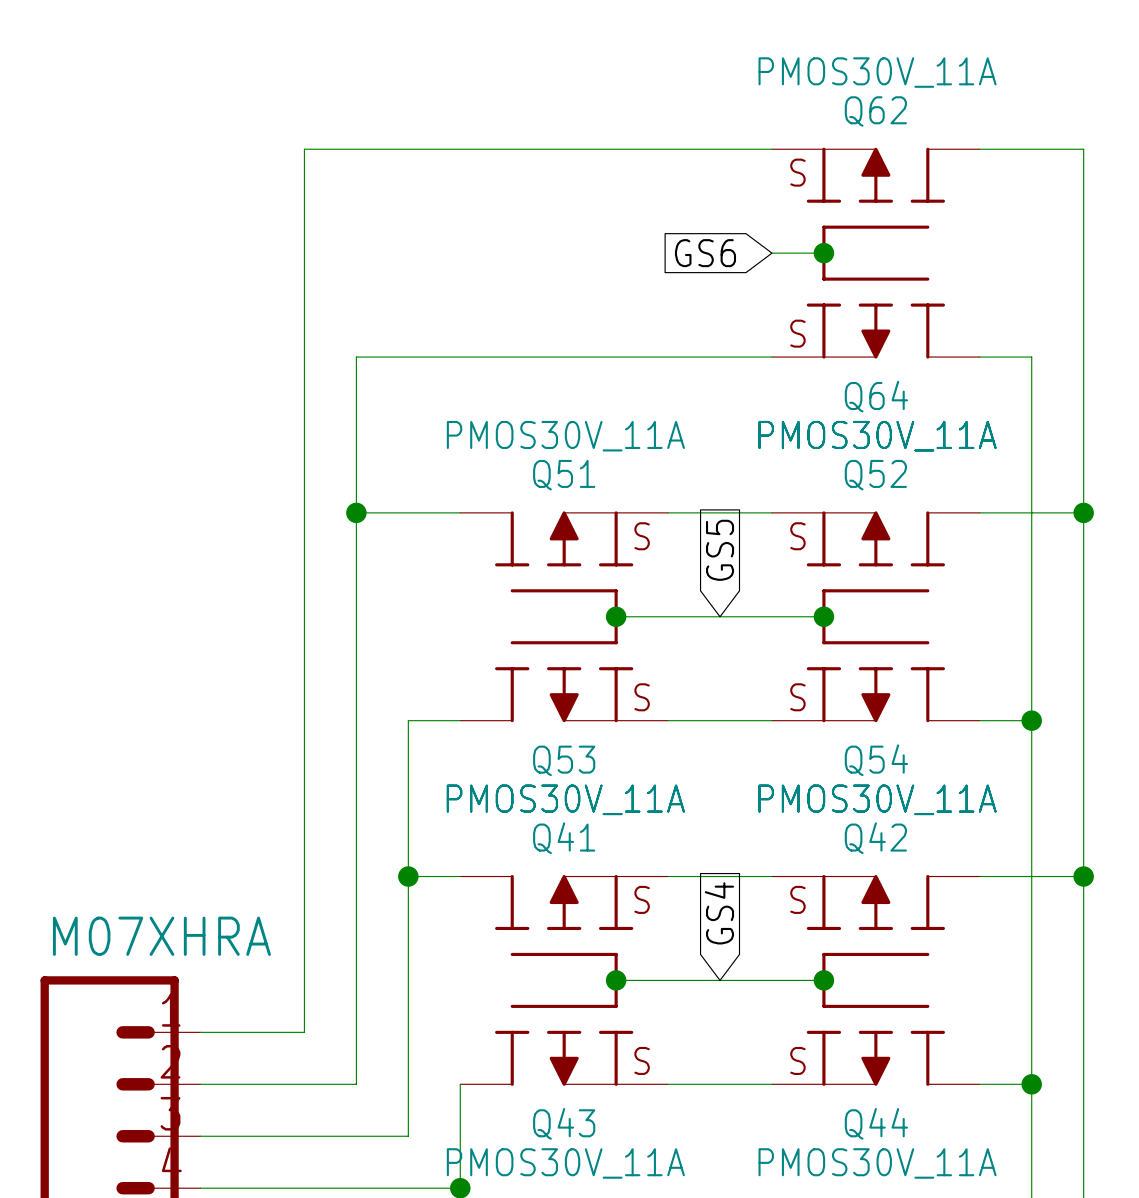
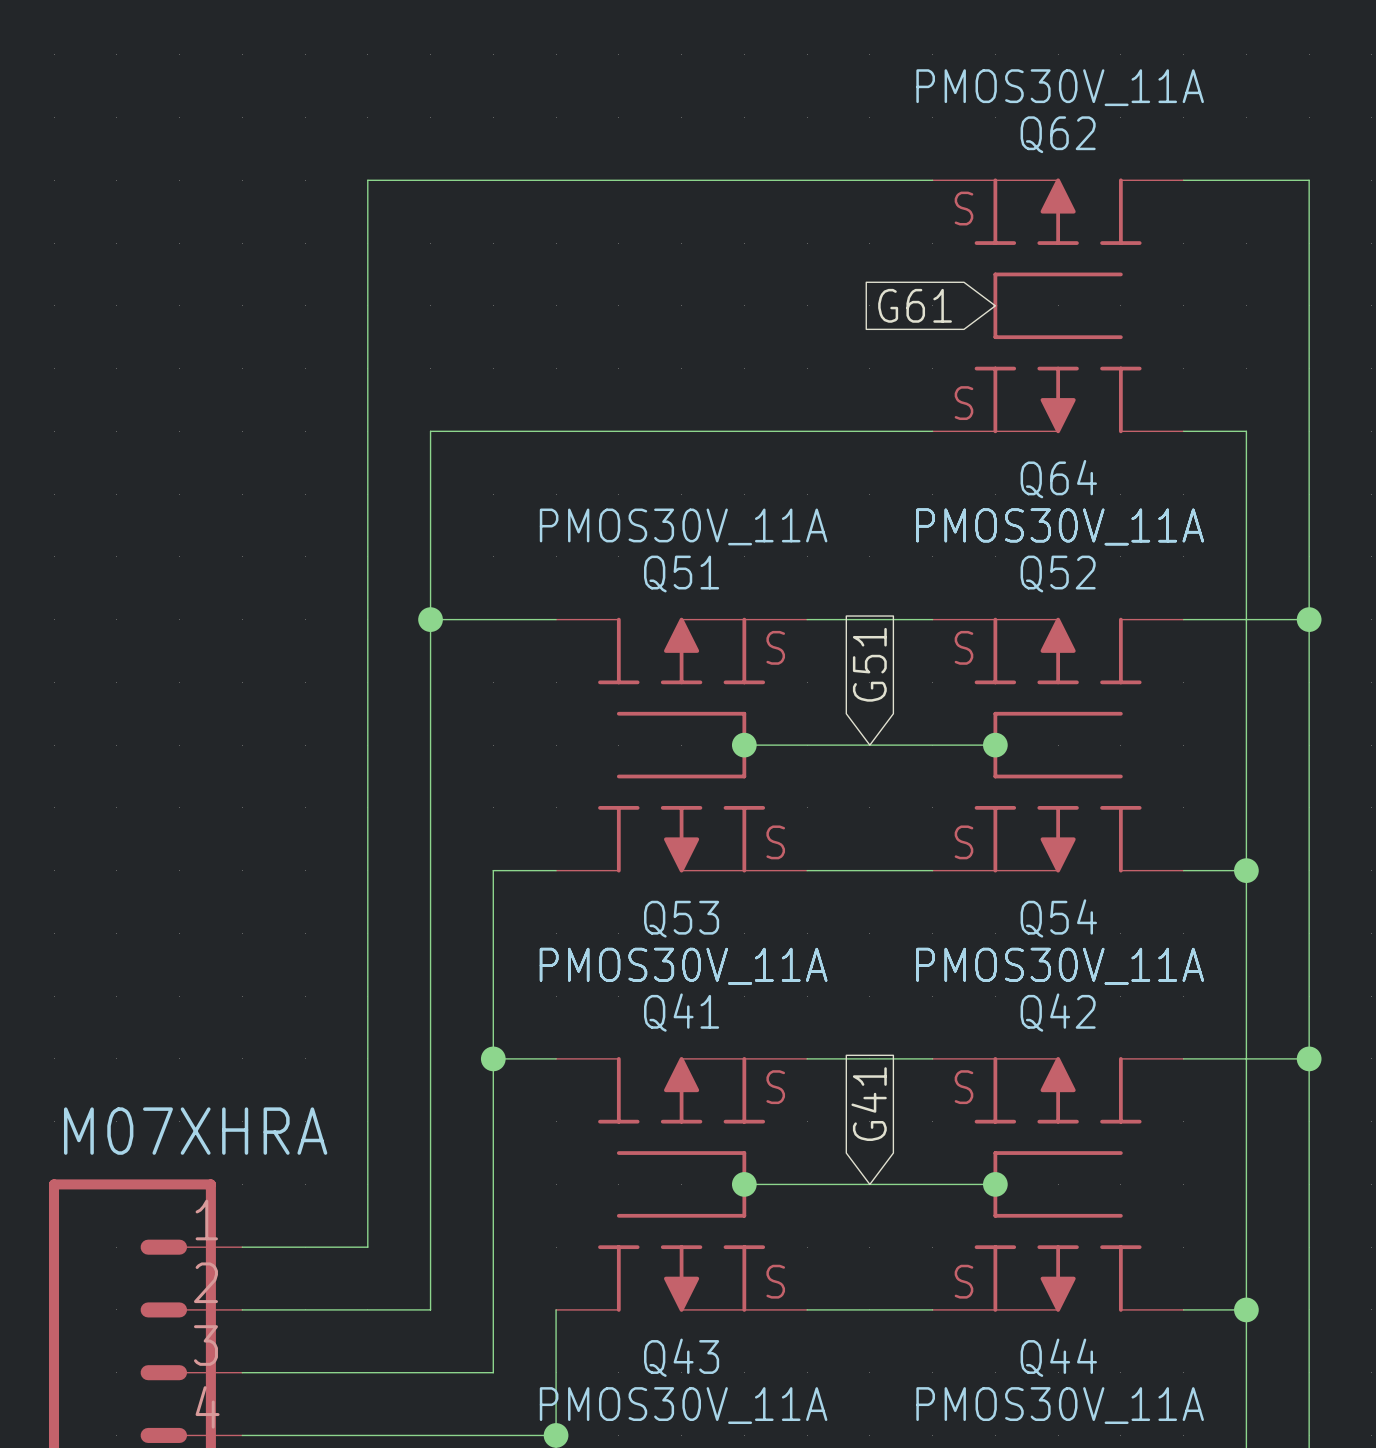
global label: GS6 (705, 253) -> G61 (915, 305)
wire: (771, 253) (823, 253) -> none
junction: (823, 253) -> none
global label: GS5 (720, 550) -> G51 (869, 664)
global label: GS4 (719, 913) -> G41 (869, 1104)

